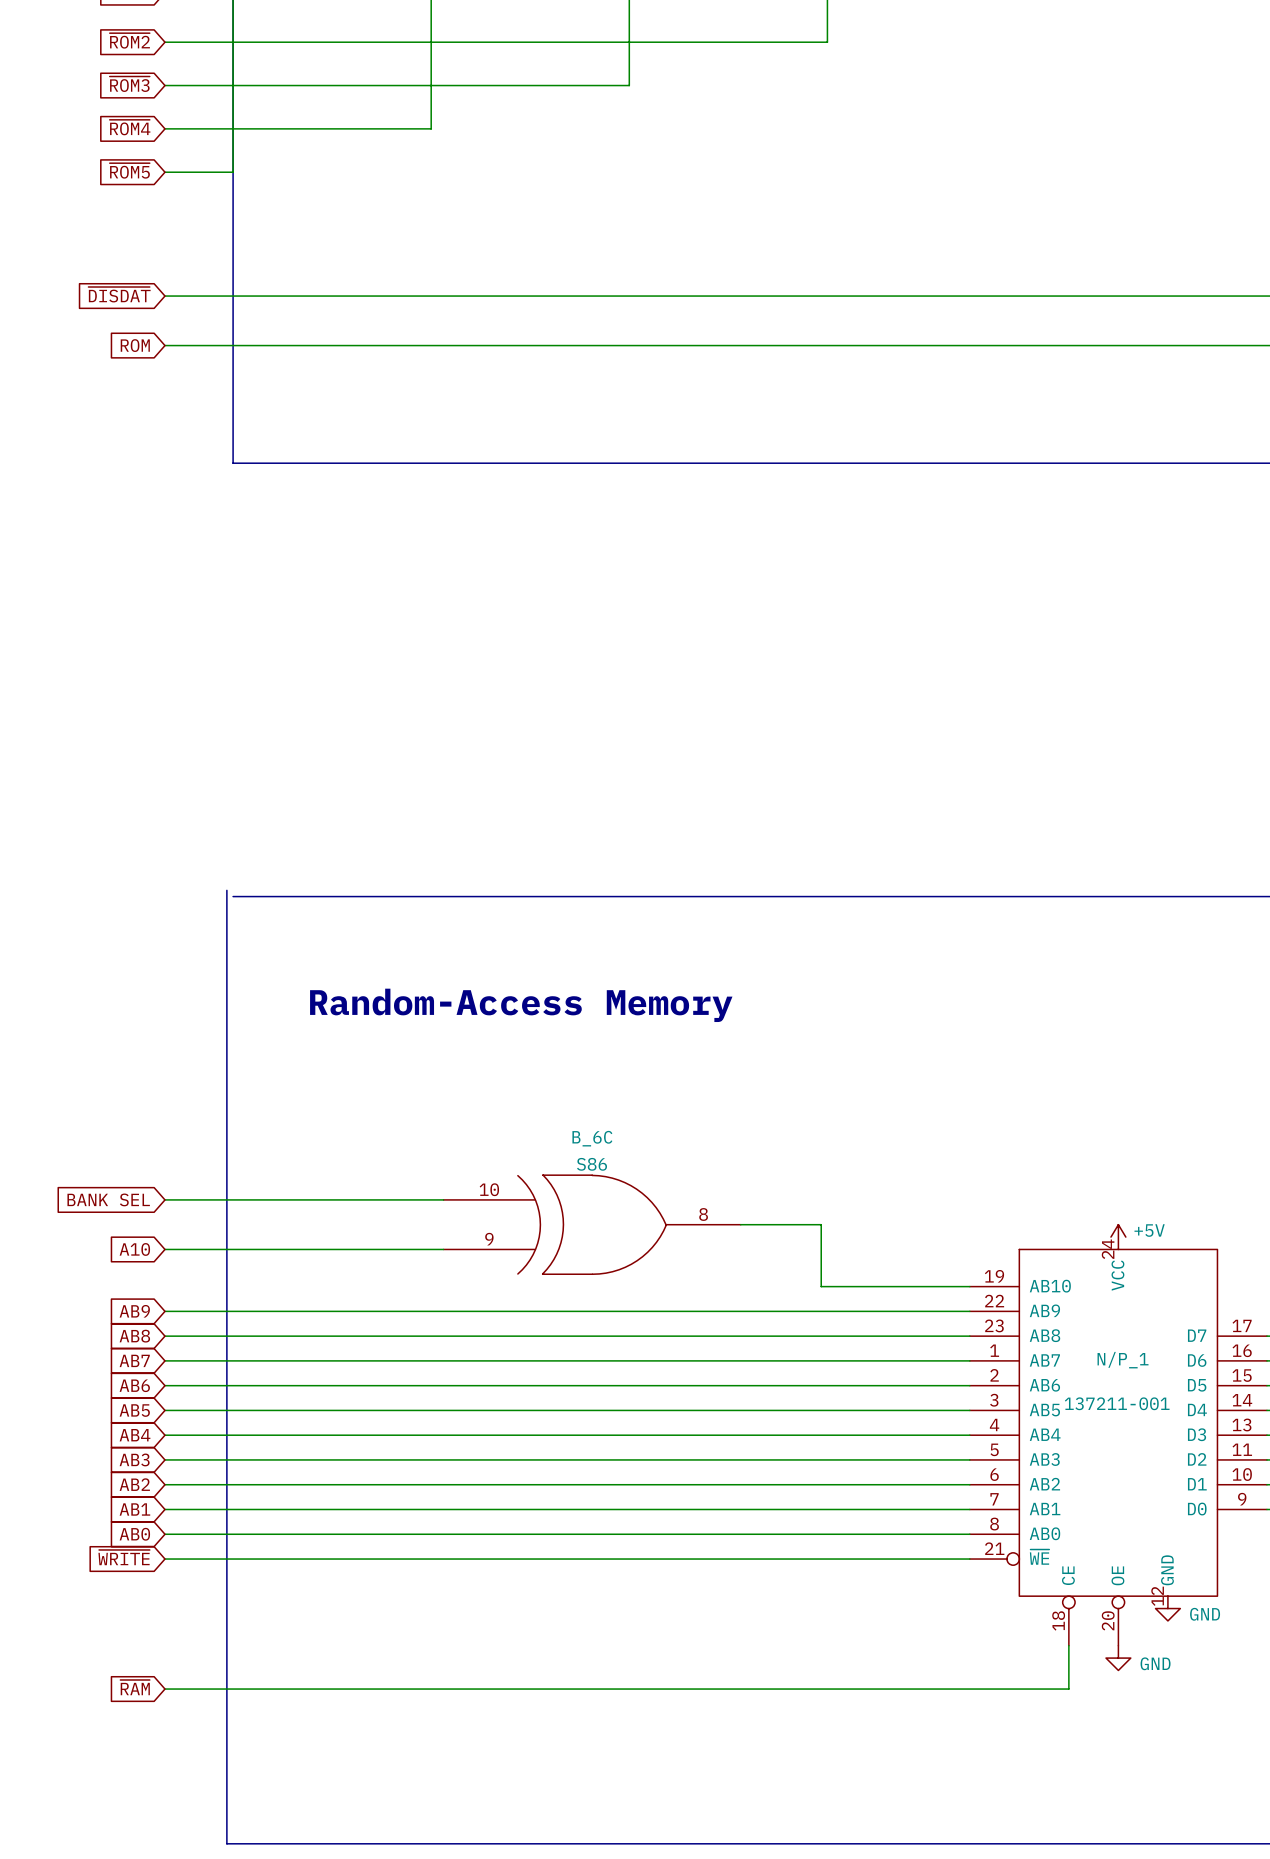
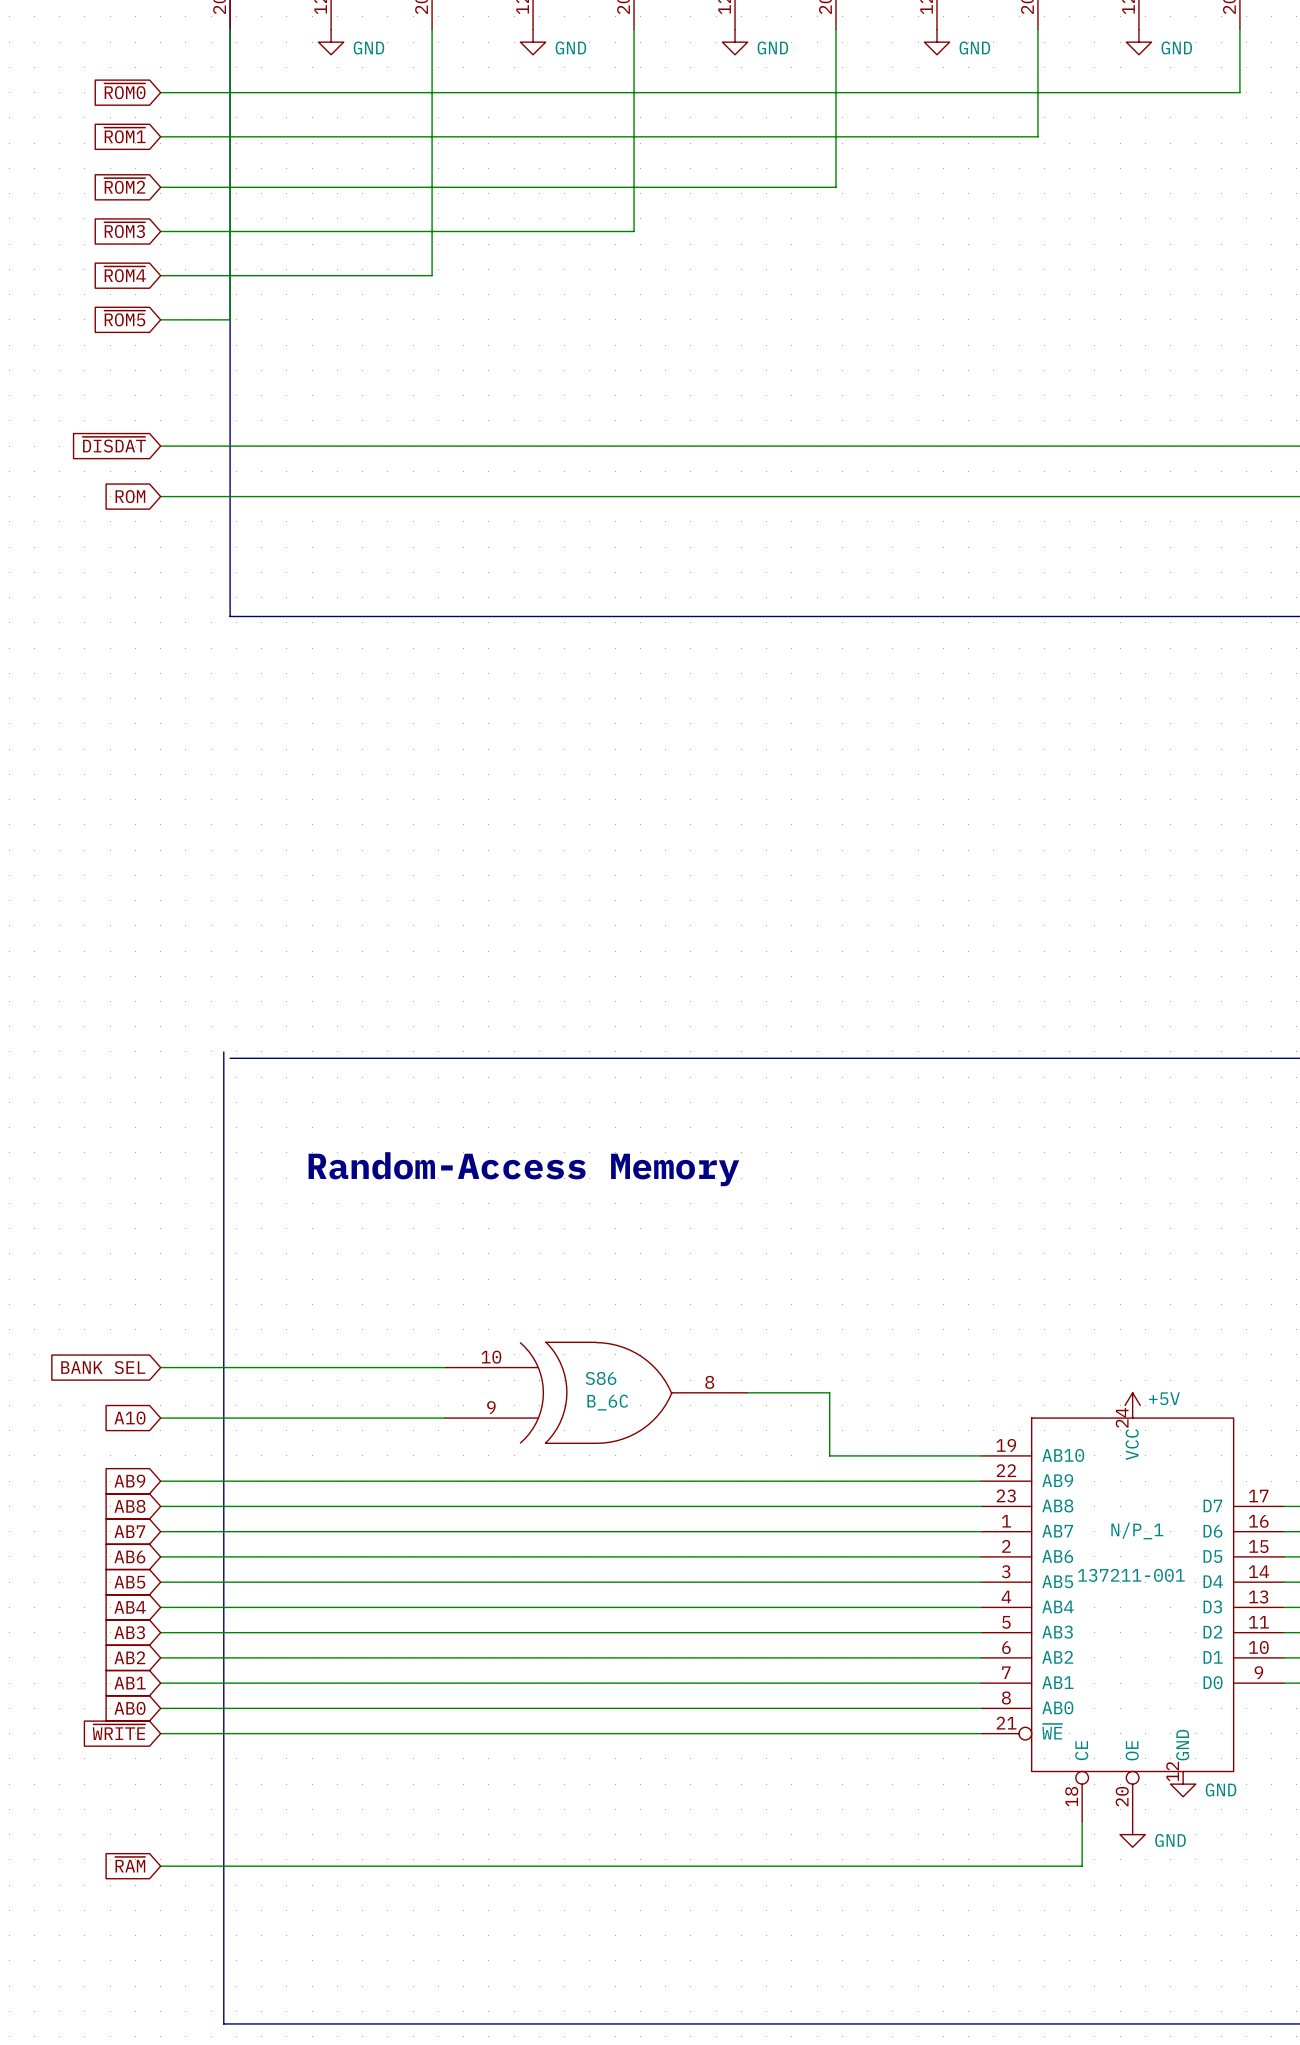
B_6C name position: B_6C (592, 1138) -> B_6C (607, 1402)
B_6C value position: S86 (591, 1164) -> S86 (601, 1378)

